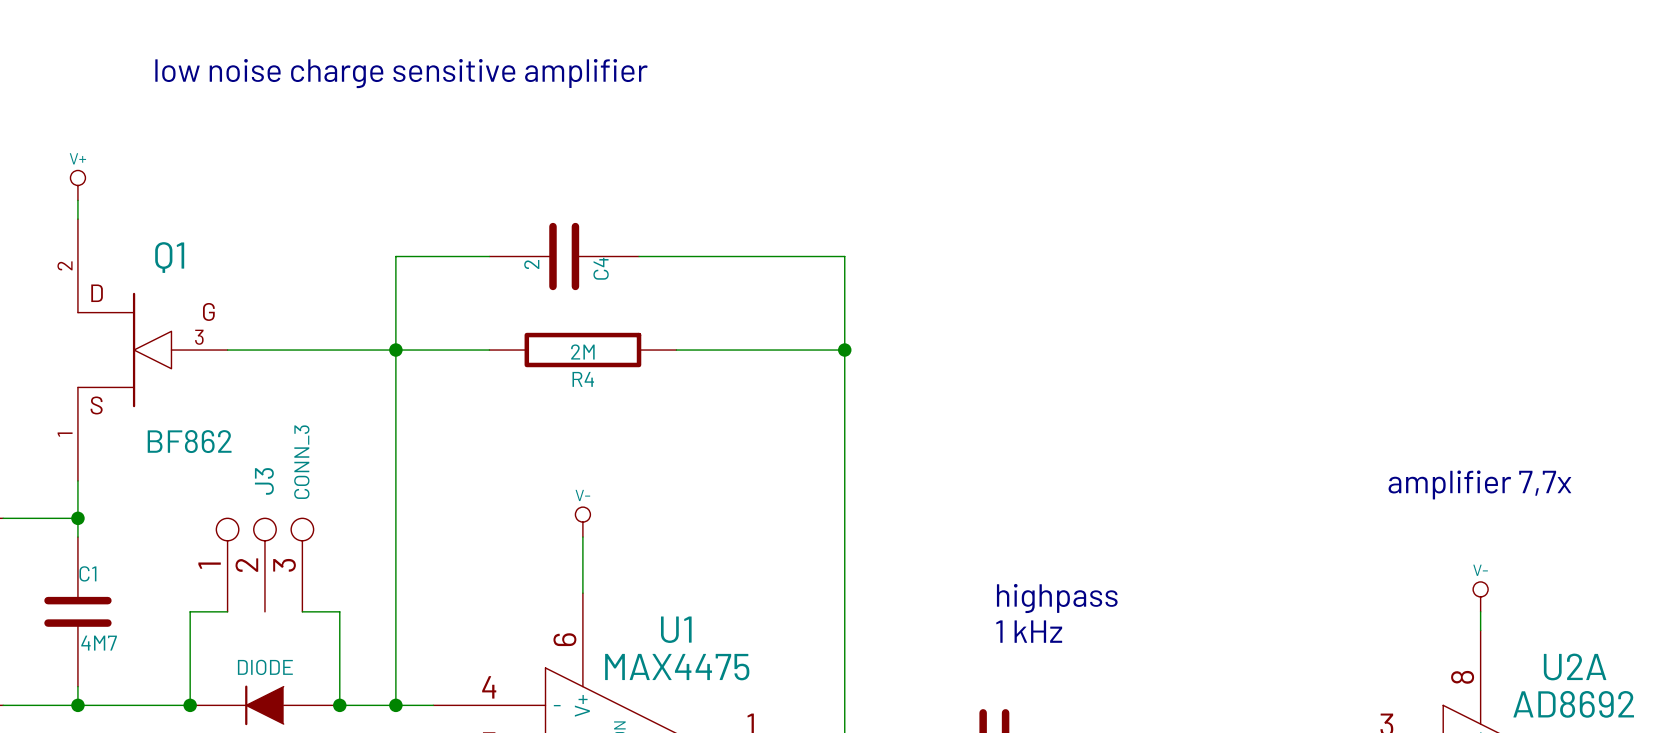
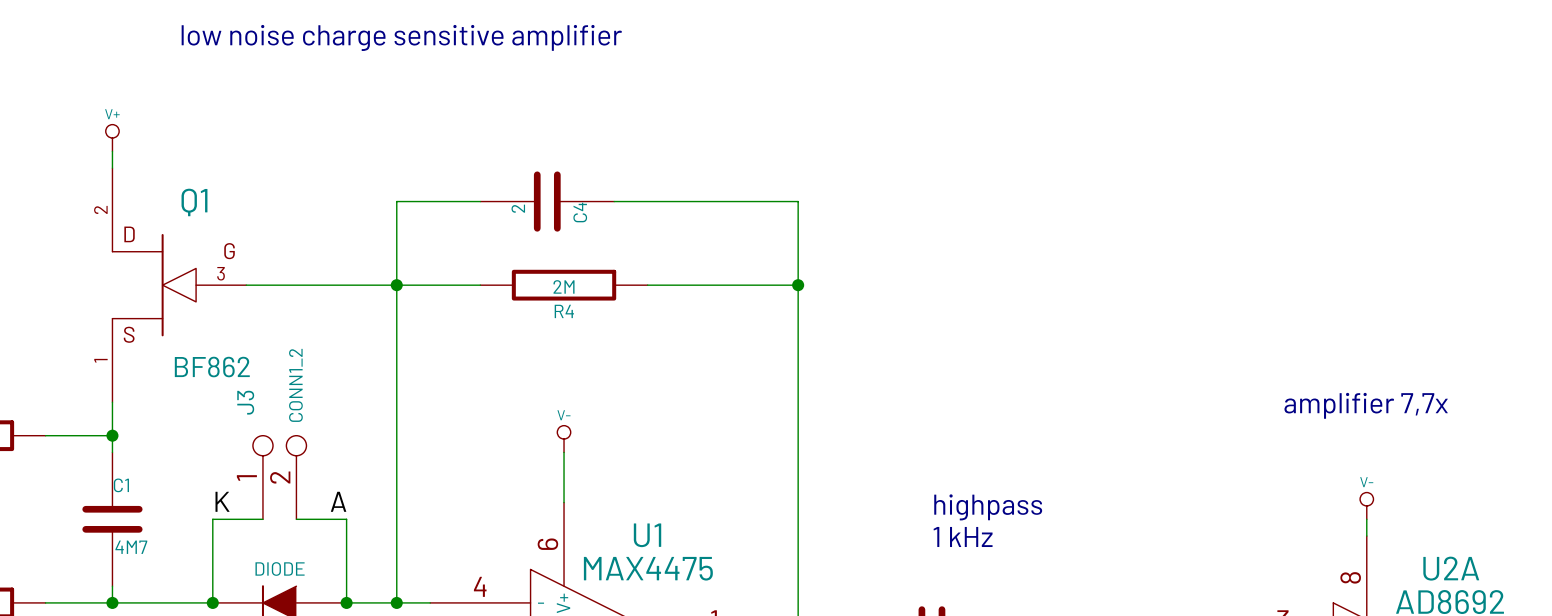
J3 value: CONN_3 (301, 462) -> CONN1_2 (295, 385)
J3 name position: J3 (264, 481) -> J3 (245, 402)
J3 symbol: [216, 518, 314, 612] -> [252, 435, 307, 520]
label: none -> K (222, 501)
label: none -> A (338, 501)
wire: none -> (246, 519) (262, 519)
wire: none -> (296, 519) (313, 519)

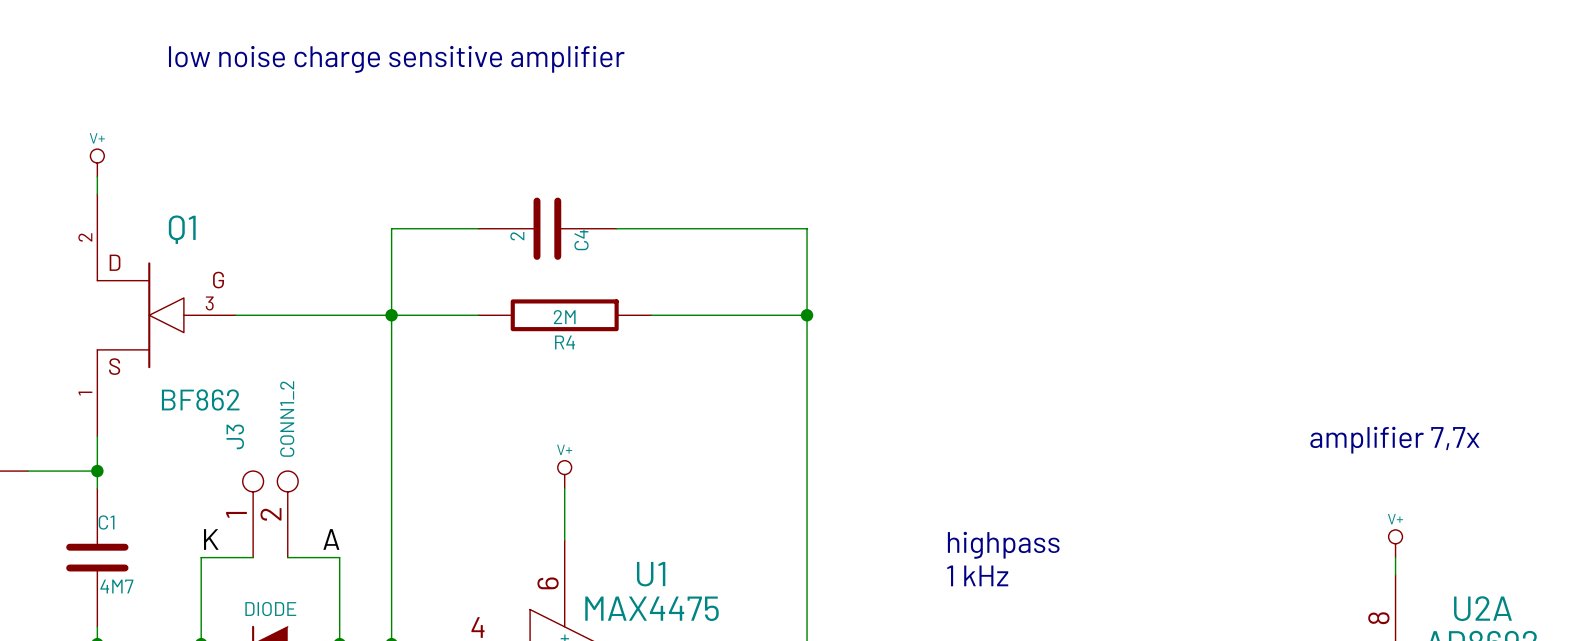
power symbol: V- (564, 439) -> V+ (564, 474)
power symbol: V- (1366, 505) -> V+ (1395, 543)

